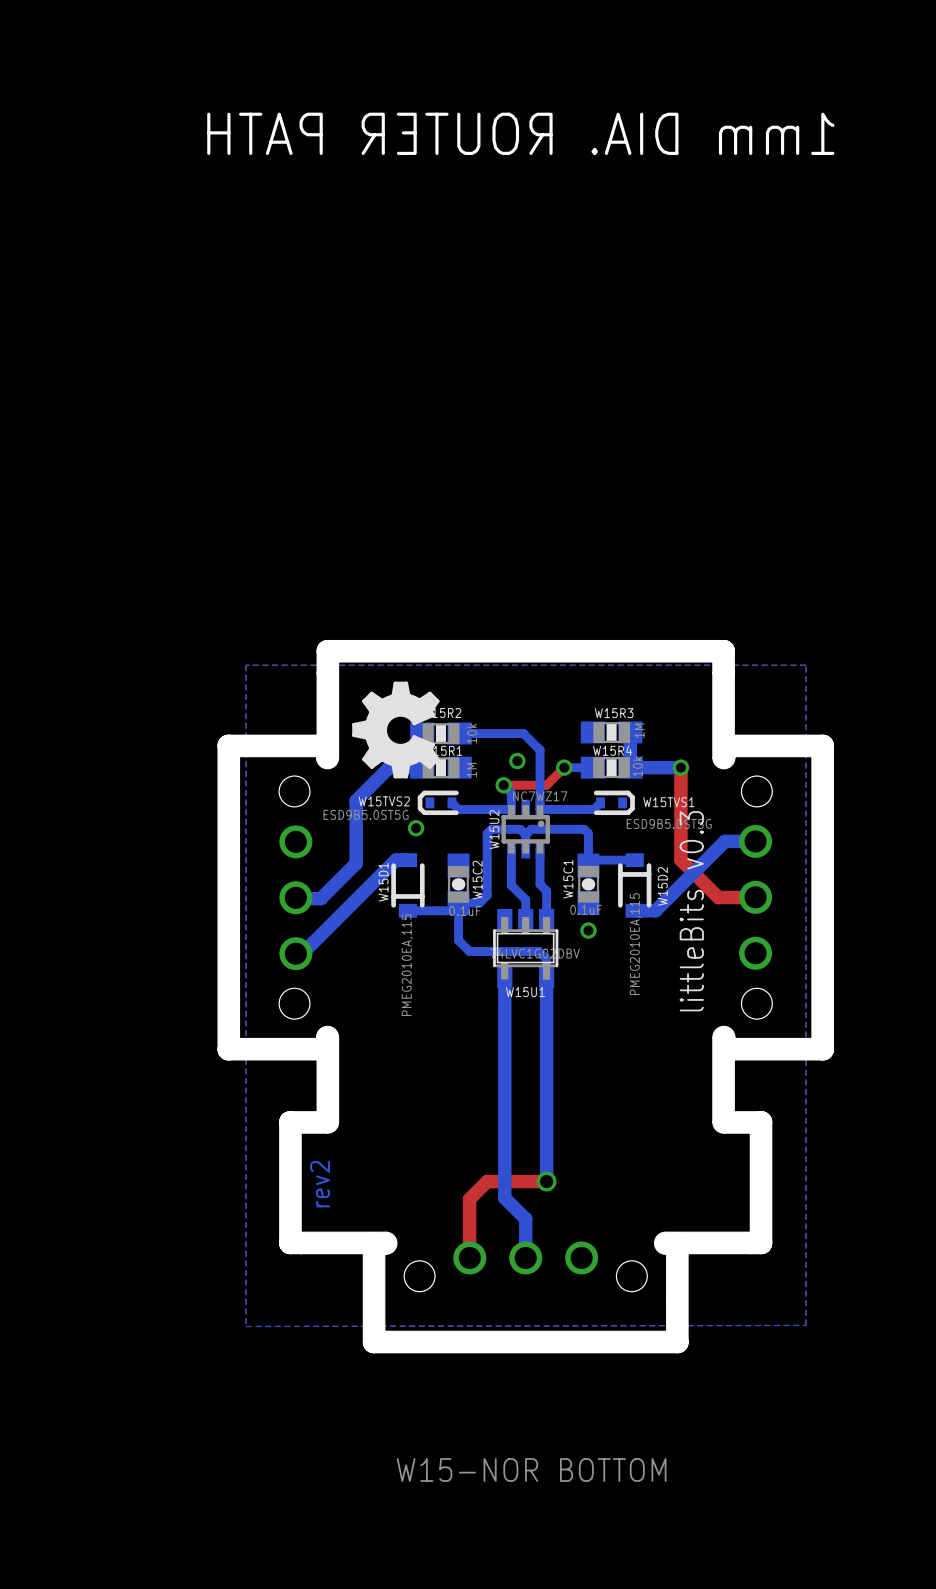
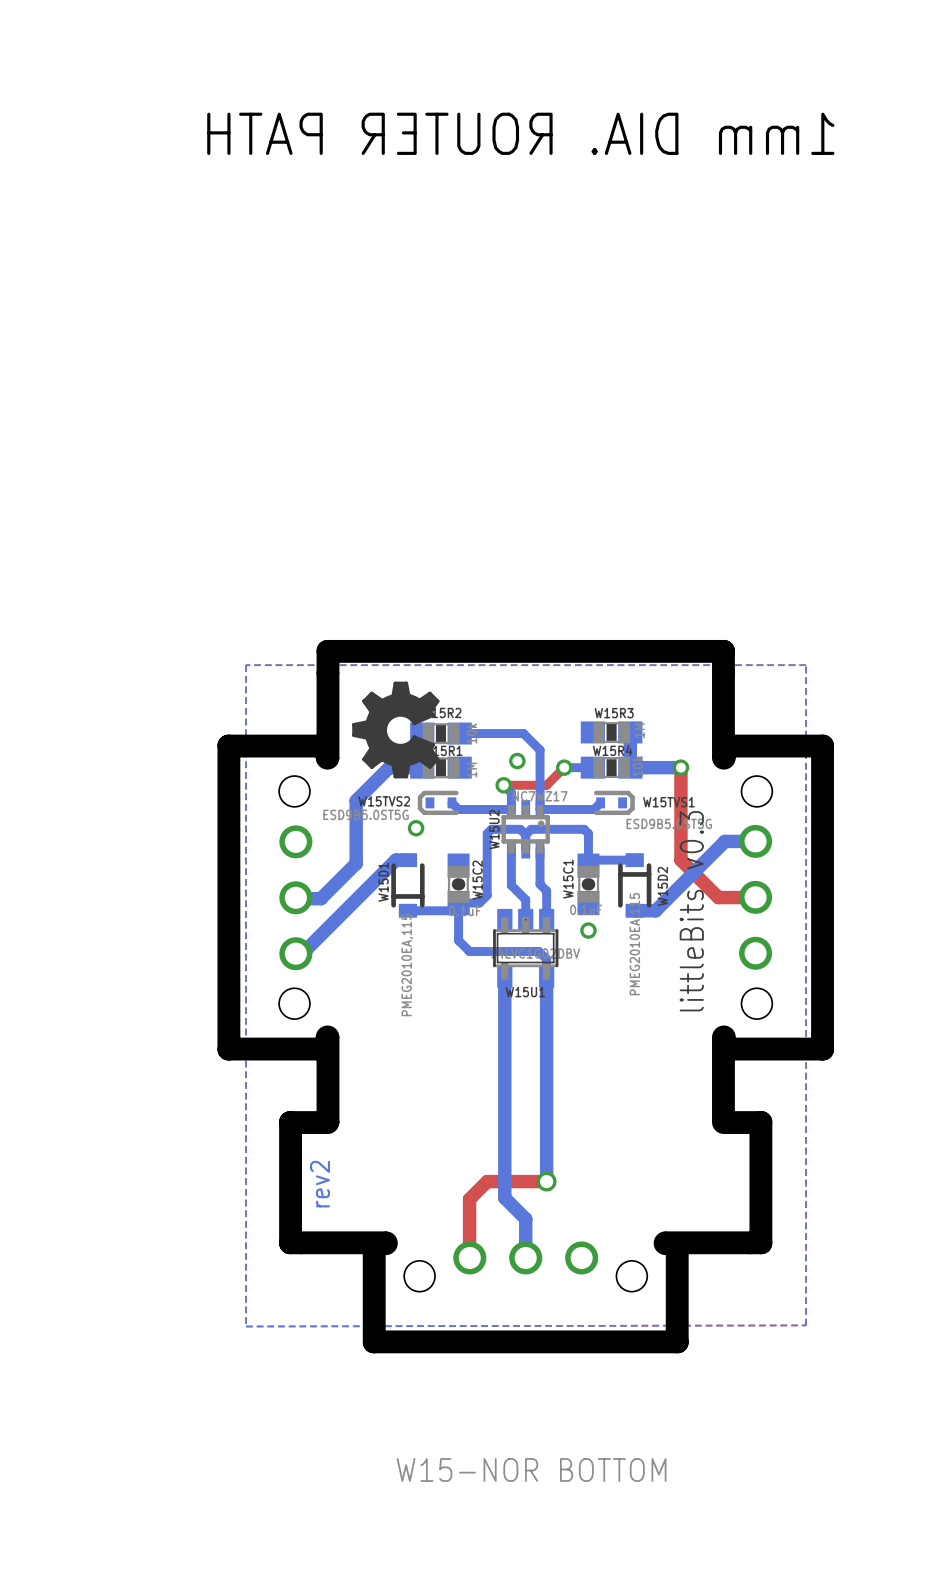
W15TVS2 footprint: [417, 790, 459, 816] -> [417, 790, 459, 816]
W15TVS1 footprint: [593, 790, 635, 816] -> [593, 790, 635, 816]

